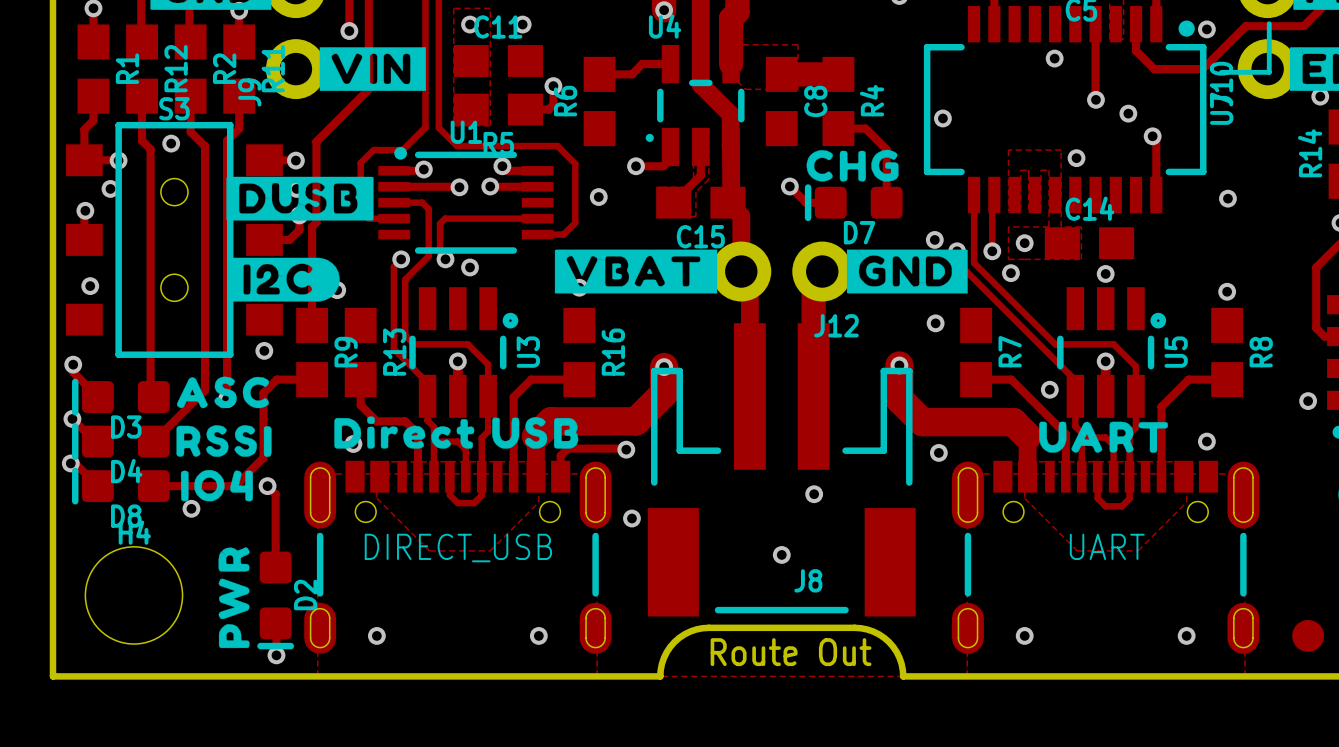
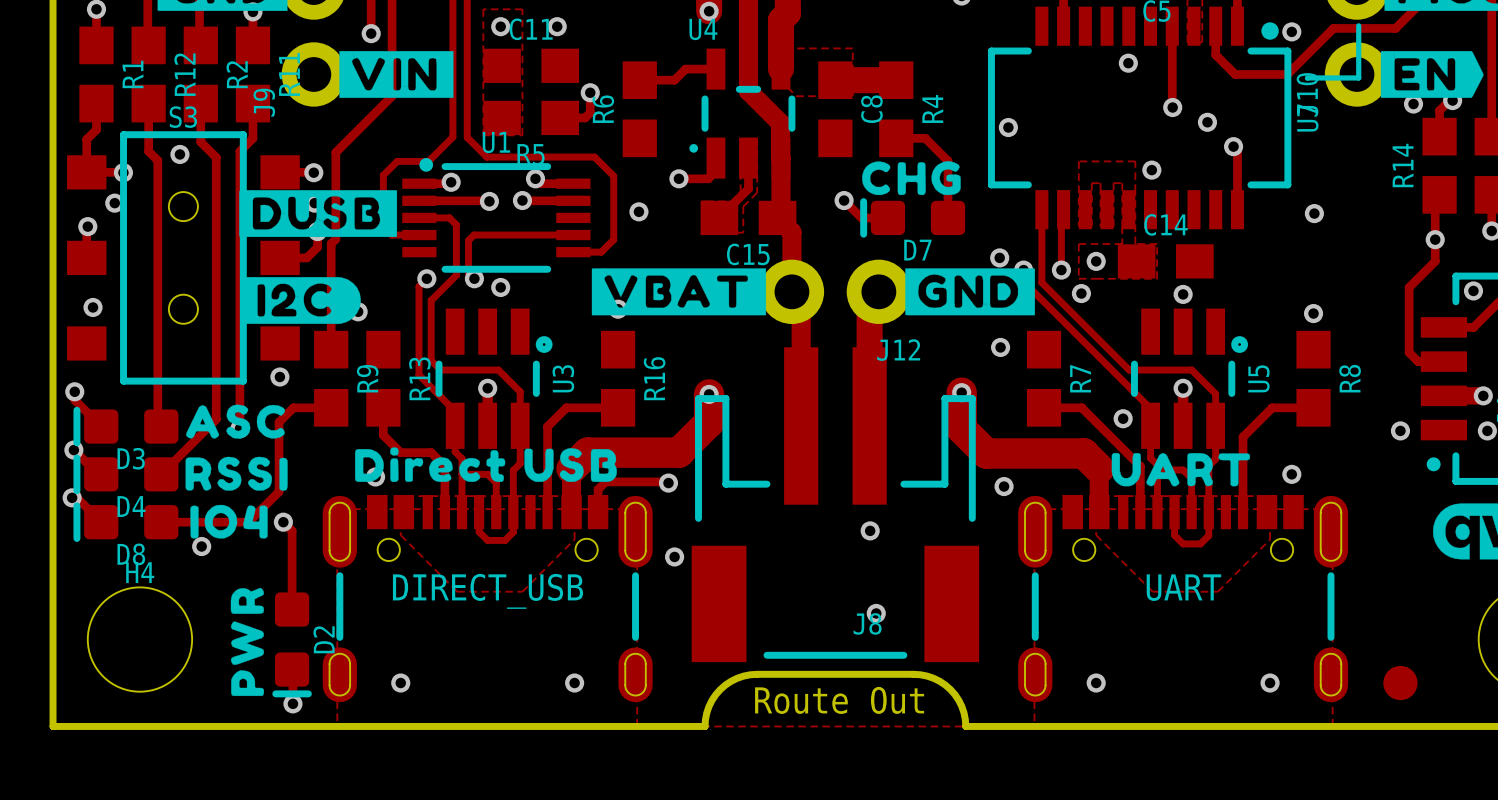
via position: (781, 554) -> (876, 613)

